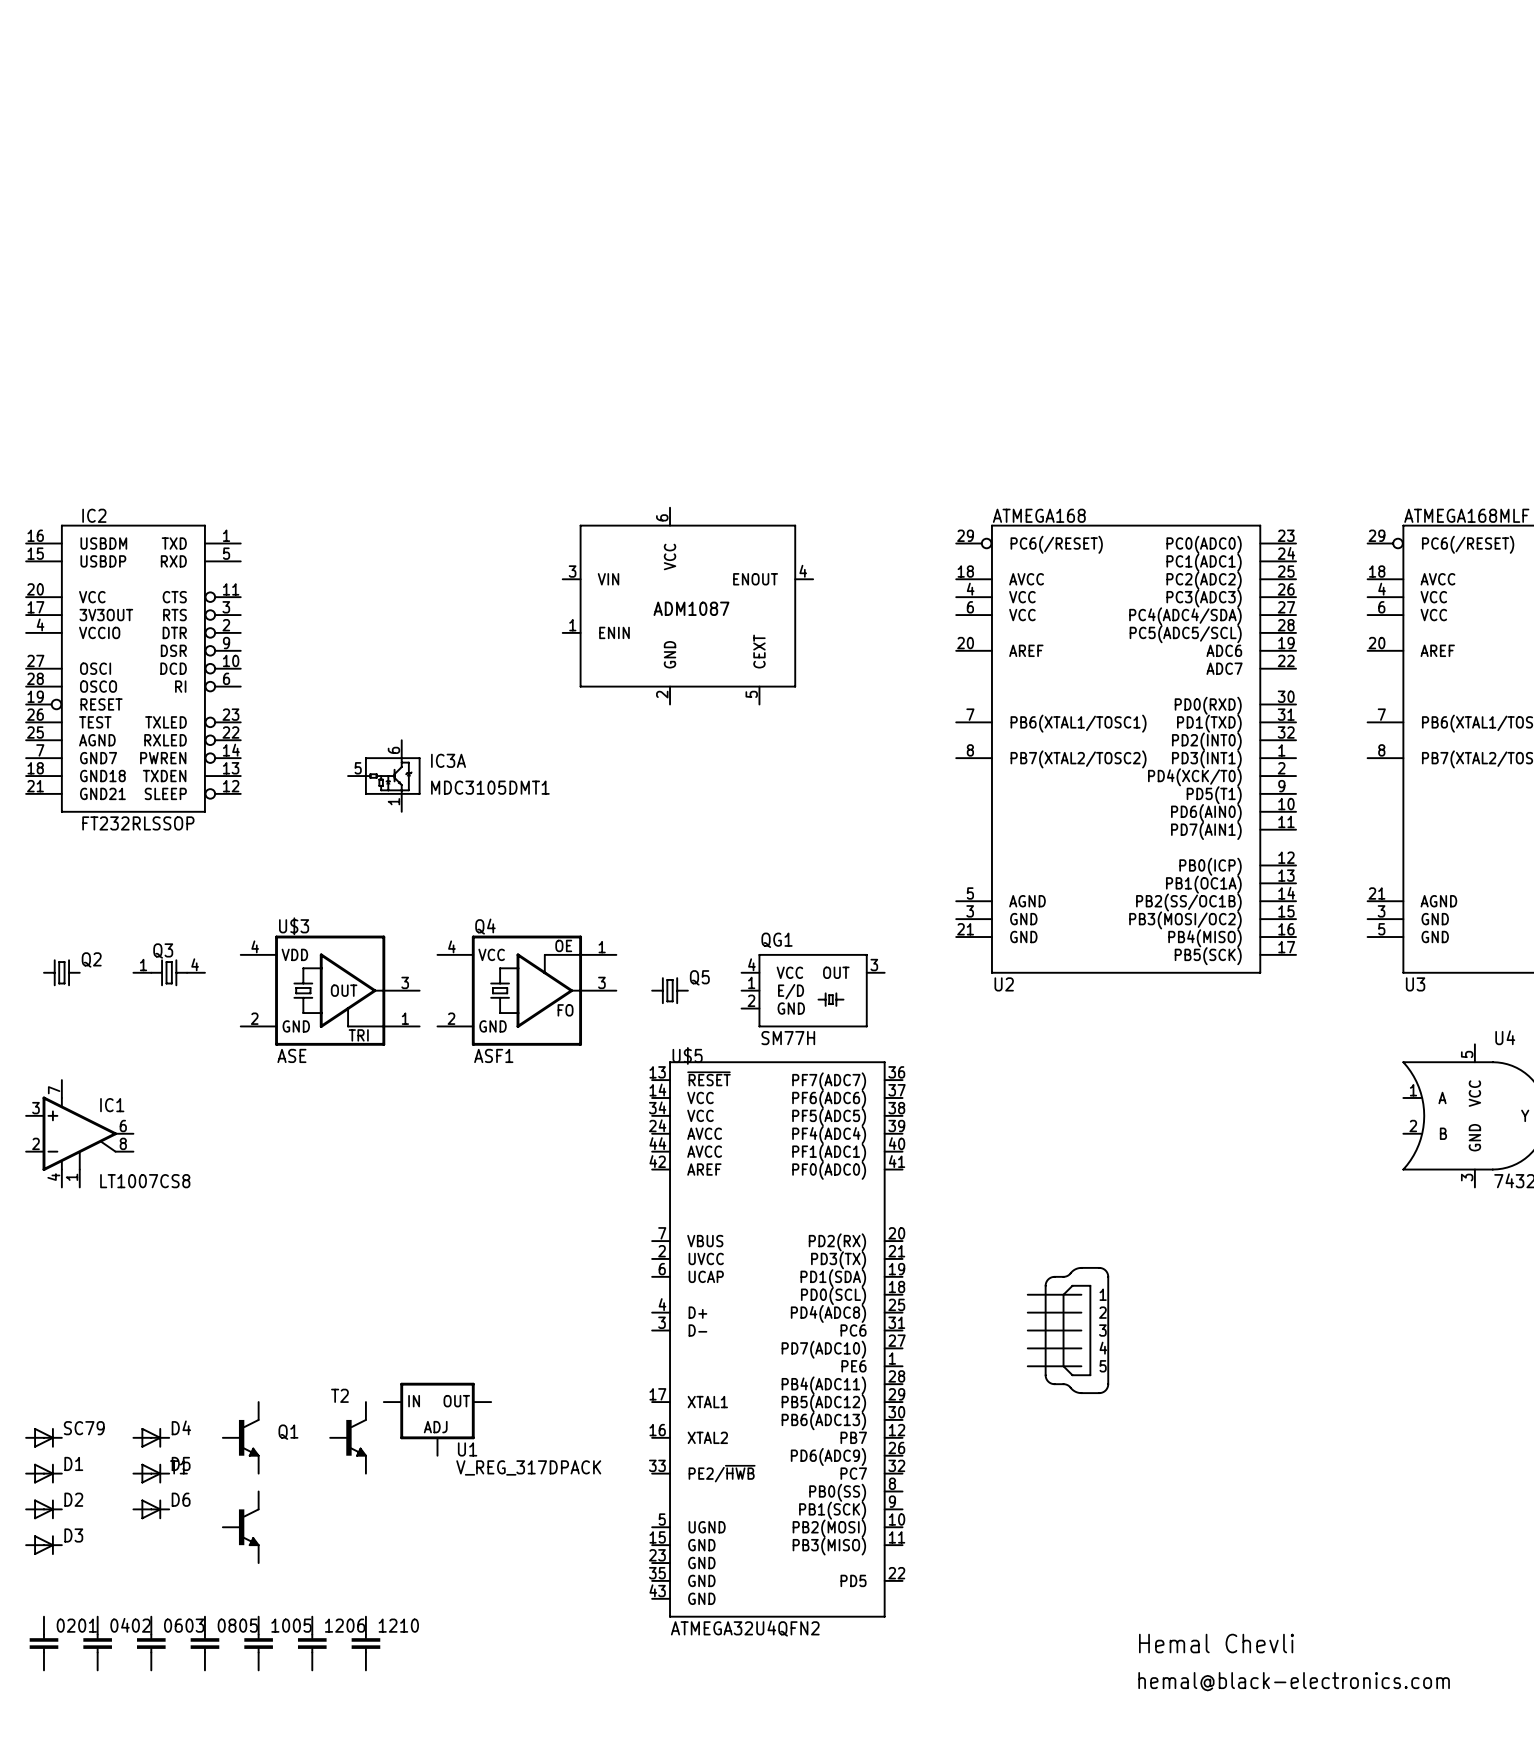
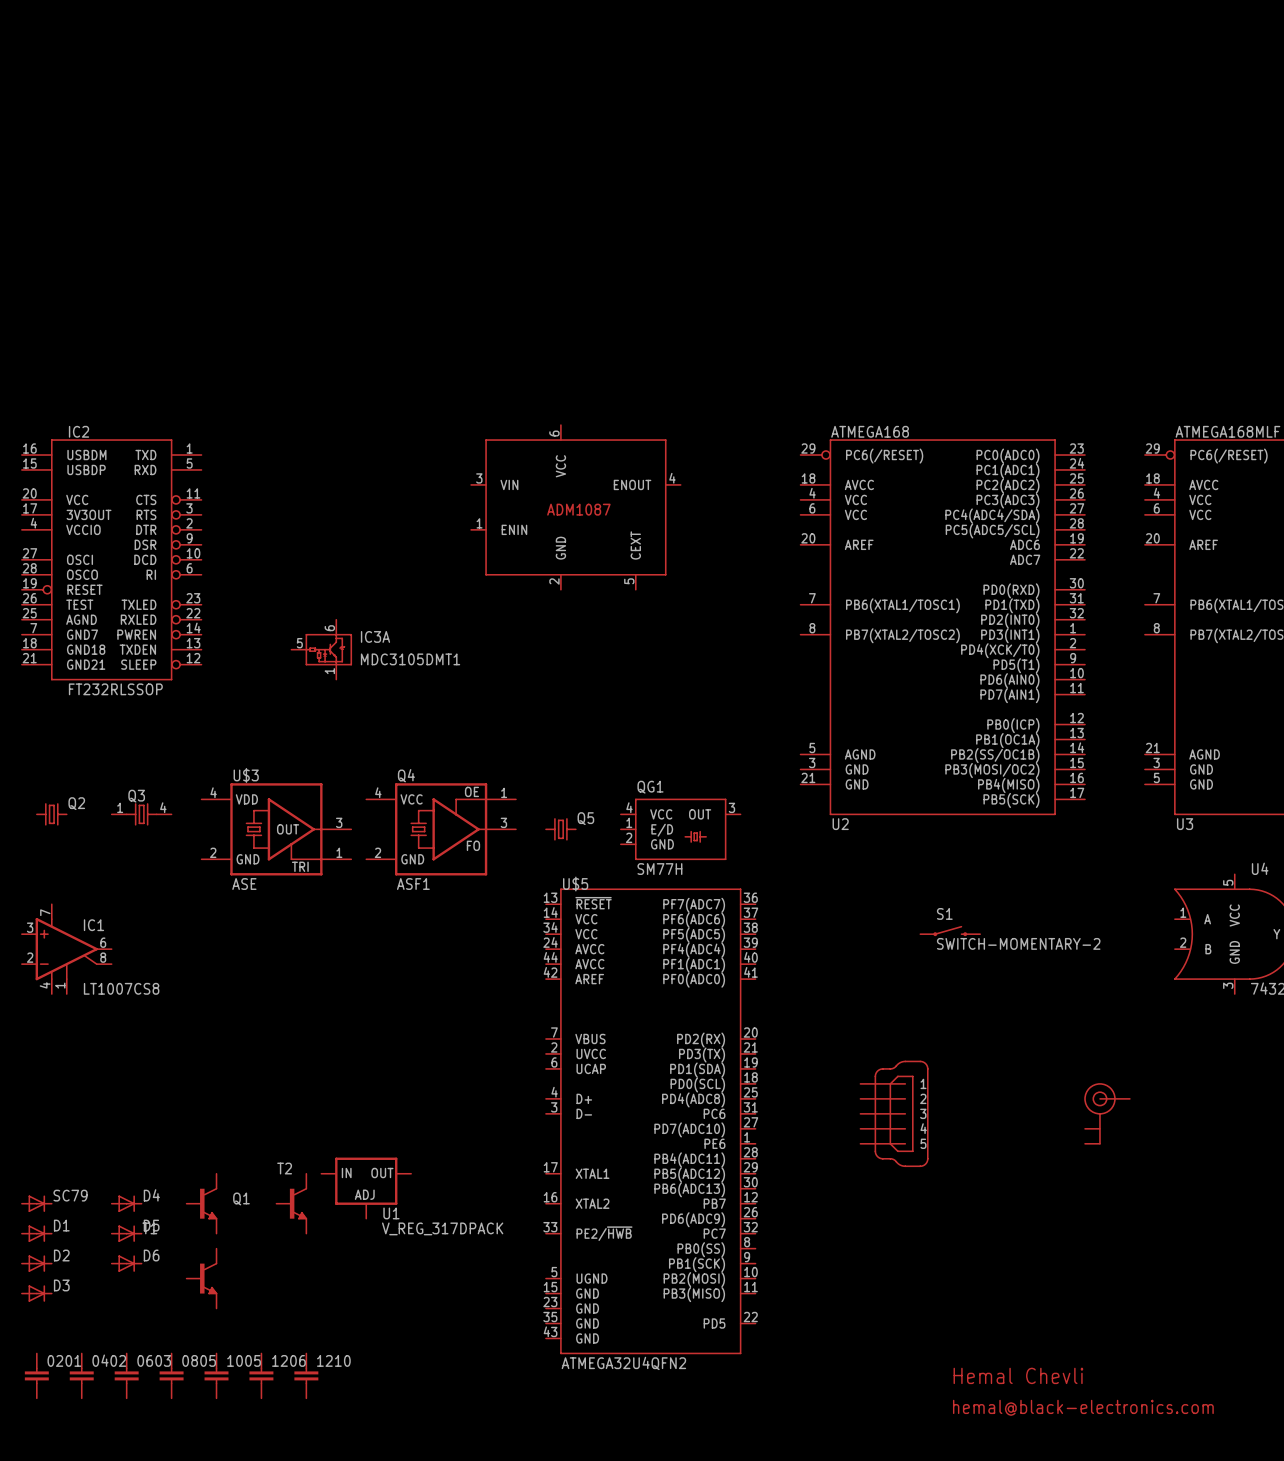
S1: none -> SWITCH-MOMENTARY-2 (950, 931)
part: none -> (1107, 1113)

